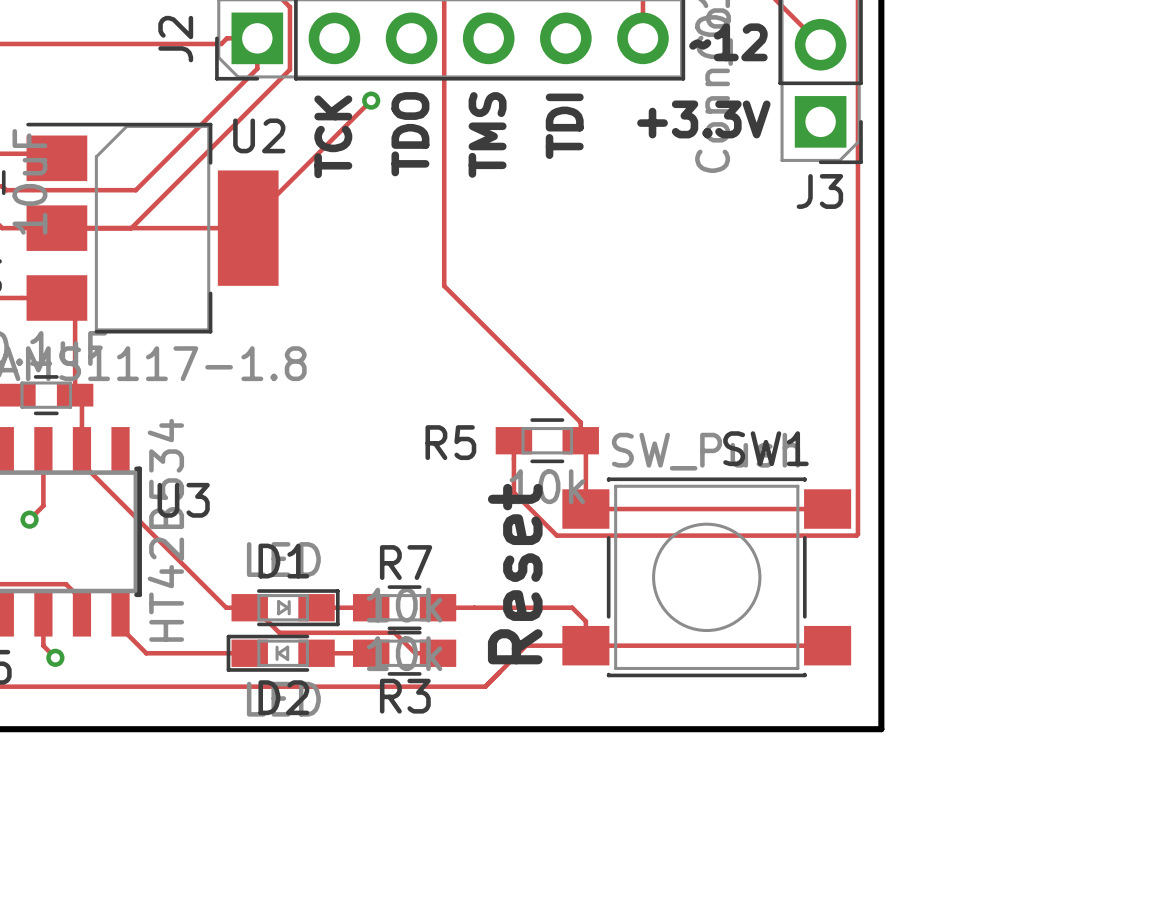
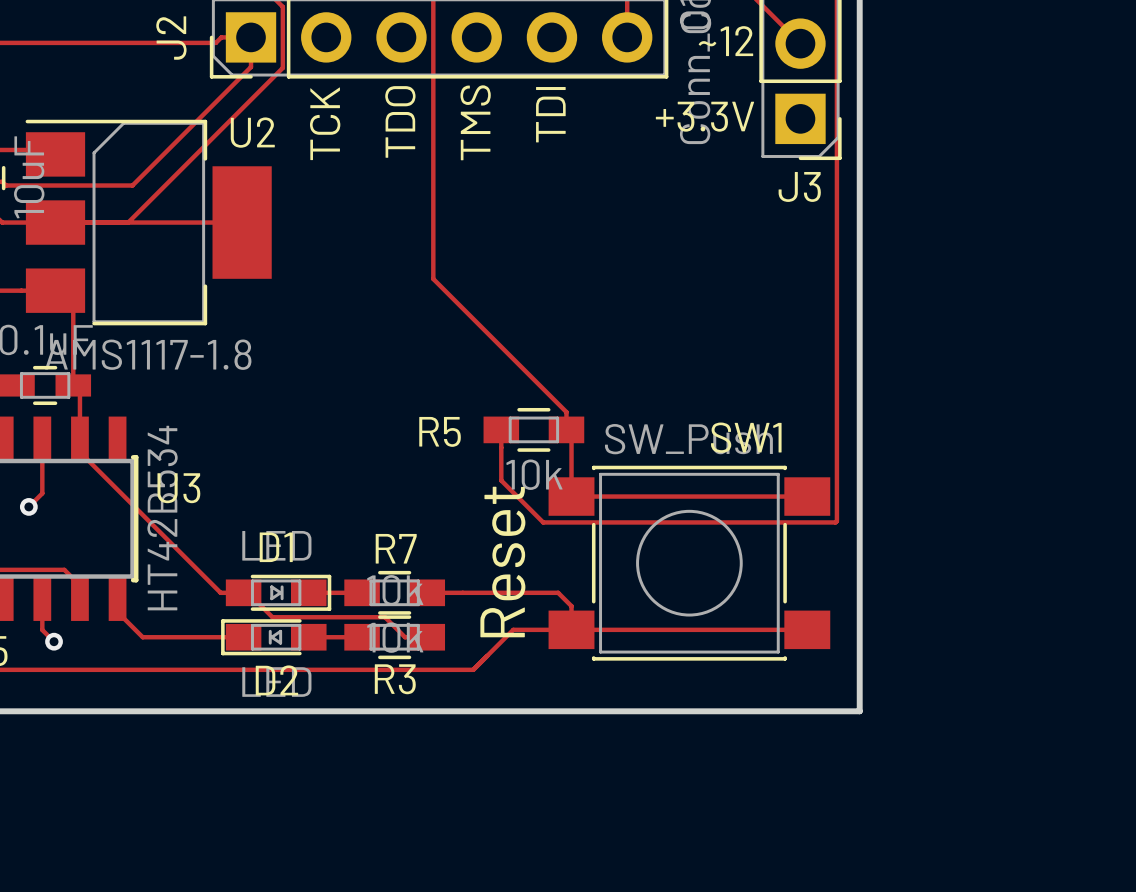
track: (371, 100) (248, 223) -> none
via: (371, 100) -> none

